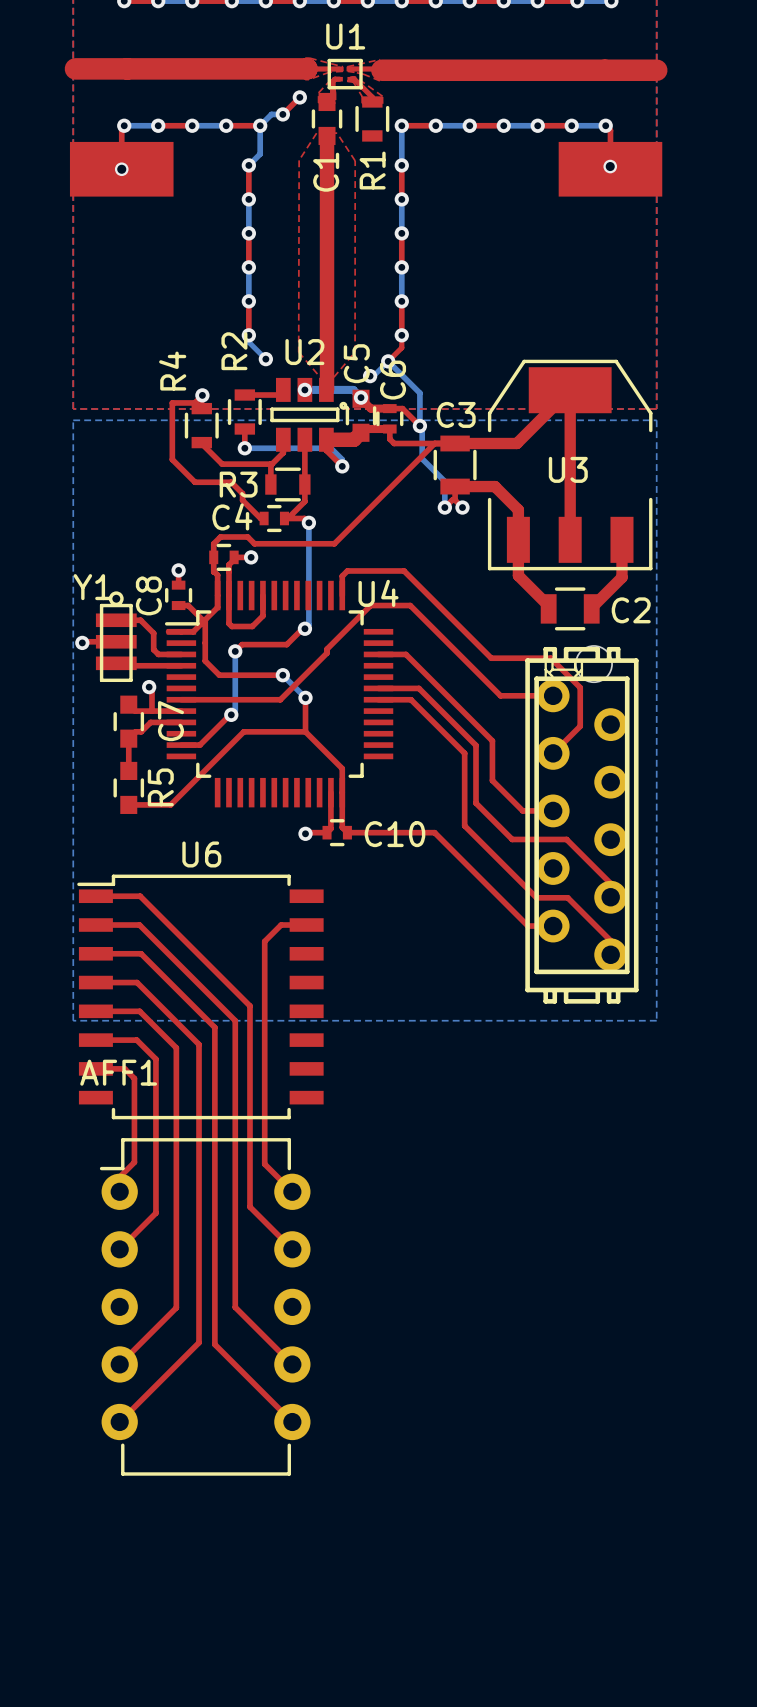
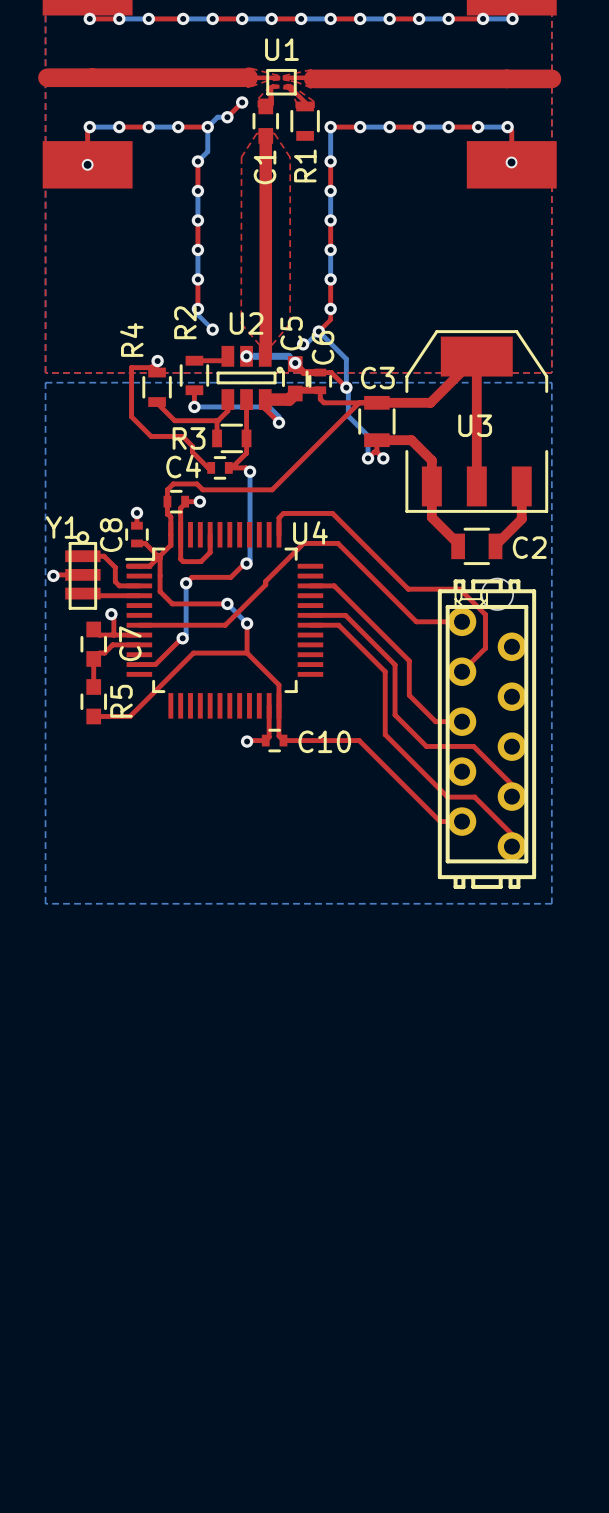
top track: (95, 896) (140, 896) (249, 1006) (249, 1206) (292, 1249) -> none
top track: (95, 925) (139, 925) (235, 1020) (235, 1307) (292, 1364) -> none
top track: (306, 925) (281, 925) (264, 941) (264, 1164) (292, 1191) -> none
top track: (95, 953) (141, 953) (214, 1027) (214, 1344) (292, 1422) -> none
top track: (95, 982) (137, 982) (199, 1044) (199, 1342) (119, 1422) -> none
U6: (200, 996) -> none
top track: (95, 1011) (139, 1011) (176, 1047) (176, 1307) (119, 1364) -> none
top track: (95, 1040) (136, 1040) (155, 1059) (155, 1213) (119, 1249) -> none
top track: (95, 1068) (124, 1068) (134, 1078) (134, 1162) (119, 1177) (119, 1191) -> none
AFF1: (205, 1306) -> none

